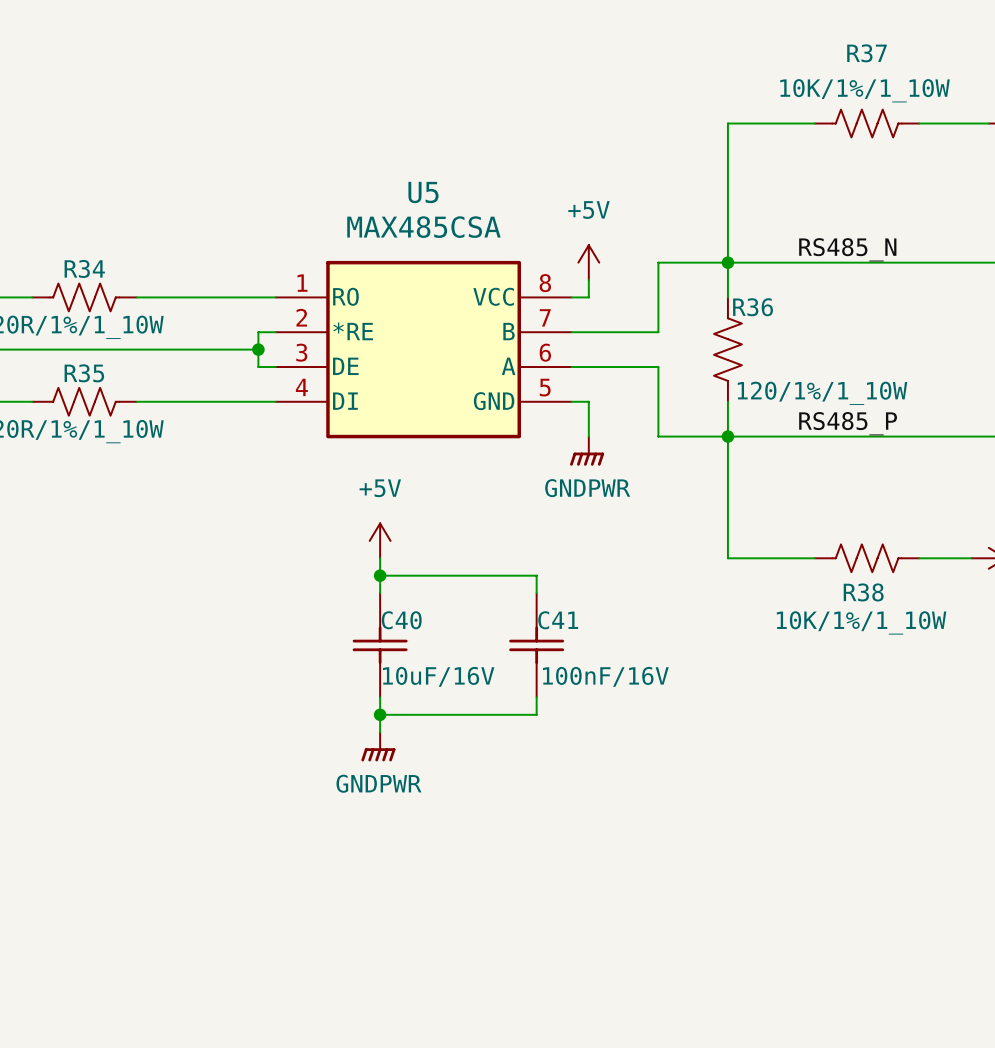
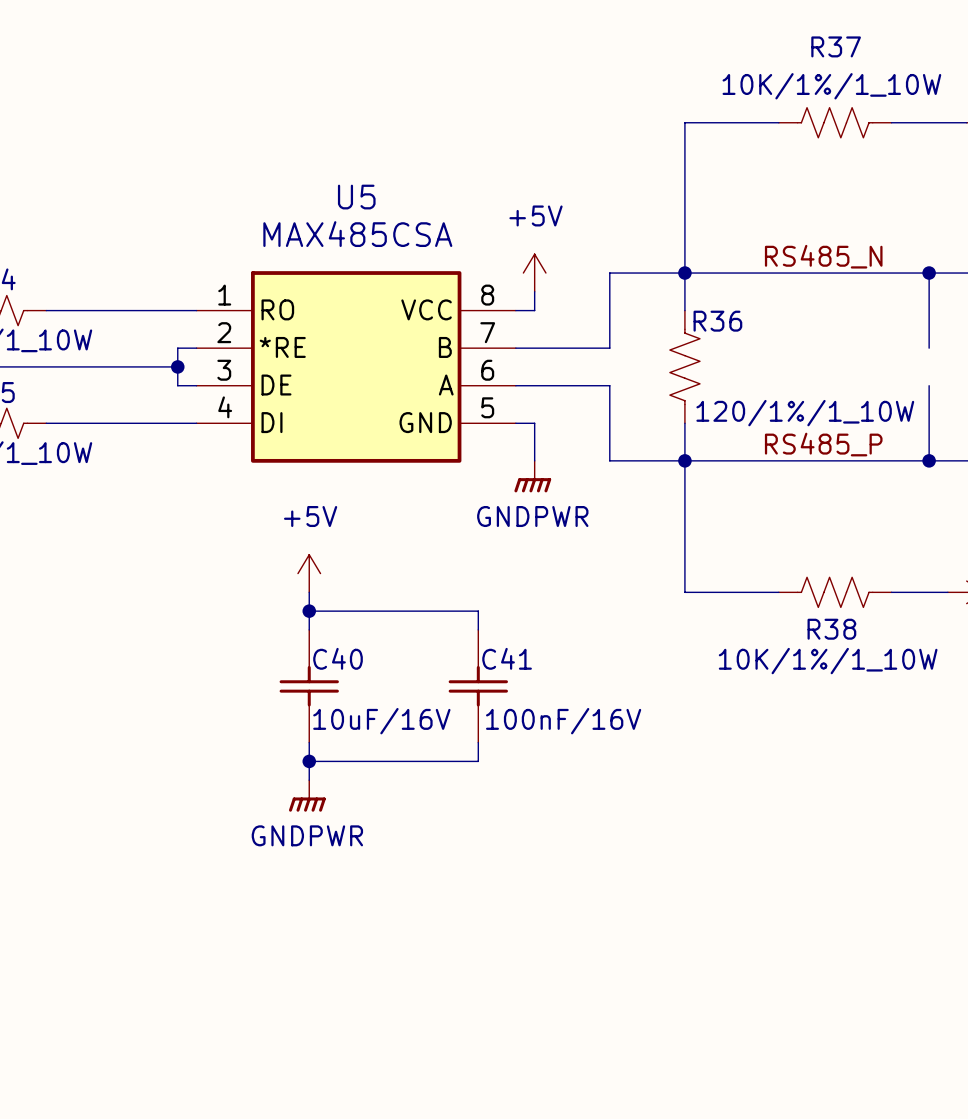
wire: none -> (929, 273) (929, 348)
junction: none -> (929, 273)
wire: none -> (929, 385) (929, 460)
junction: none -> (929, 460)

